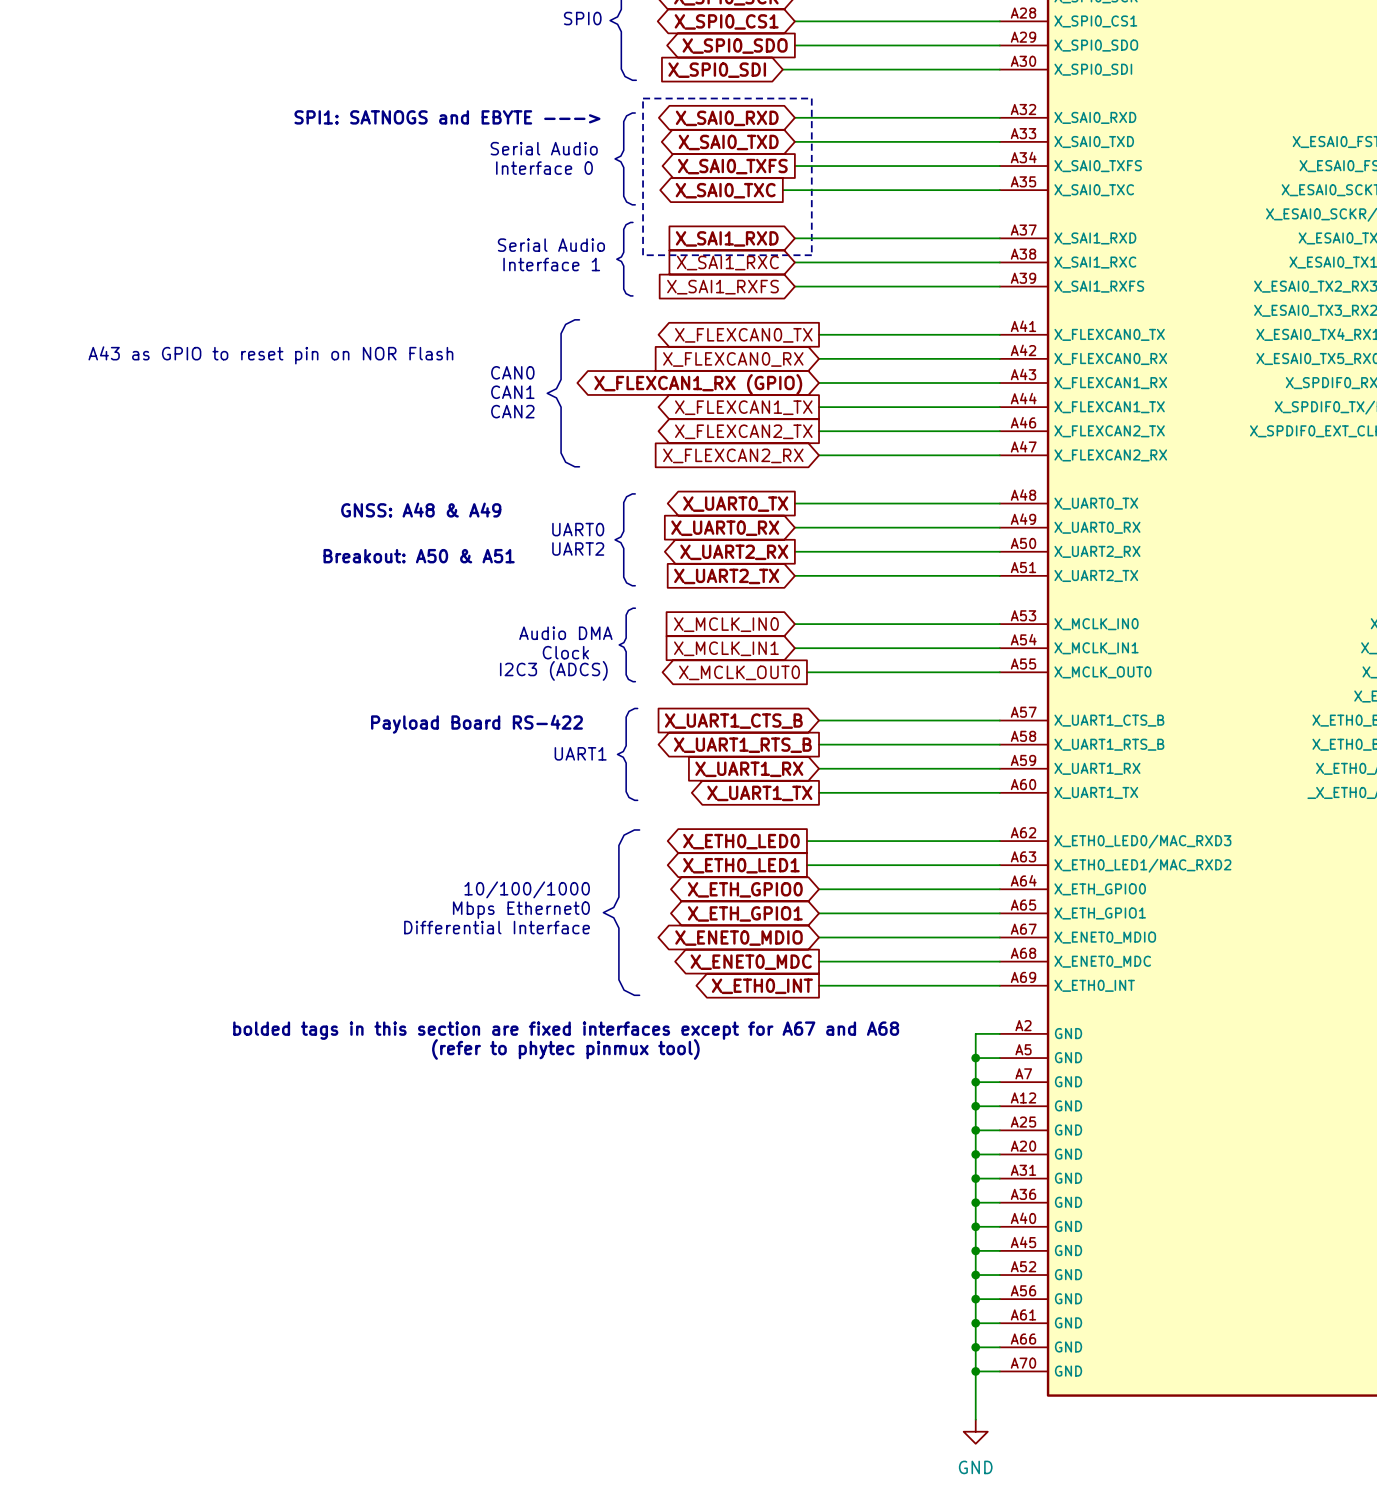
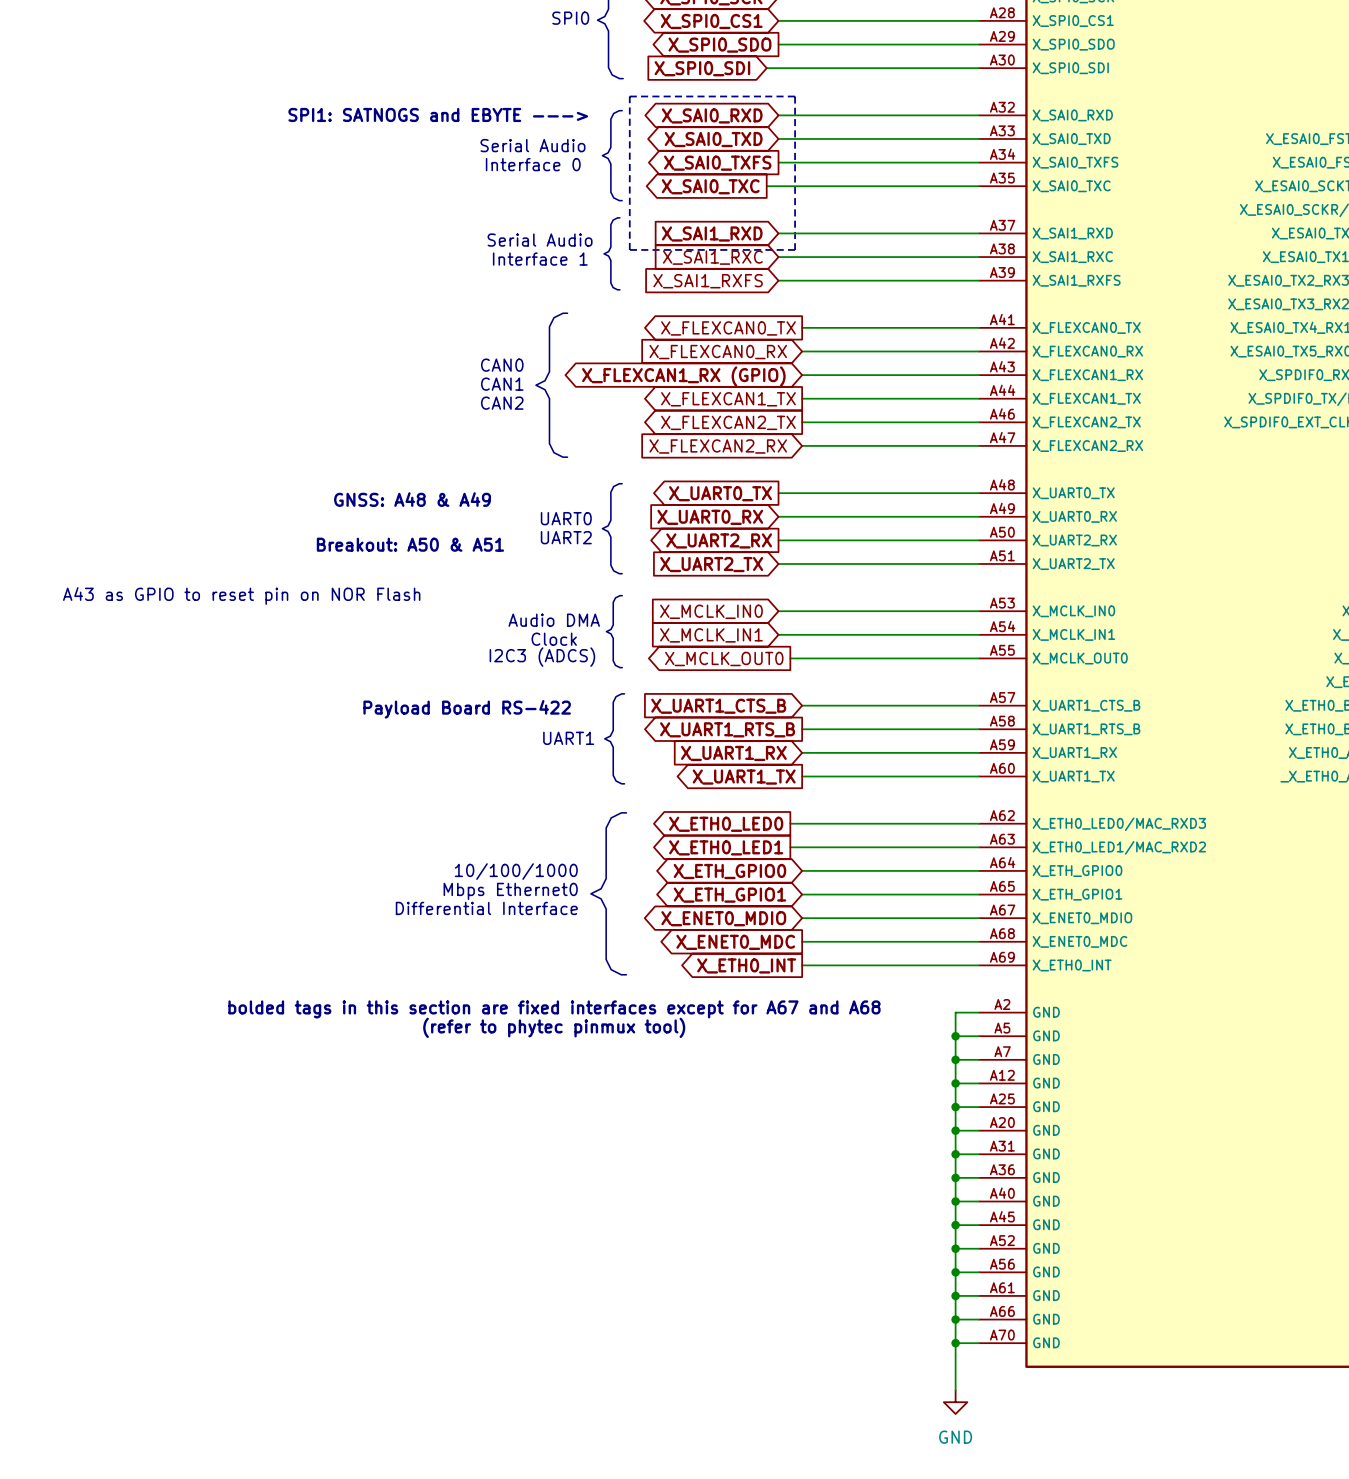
text: A43 as GPIO to reset pin on NOR Flash (270, 355) -> none
text: none -> A43 as GPIO to reset pin on NOR Flash (241, 595)

